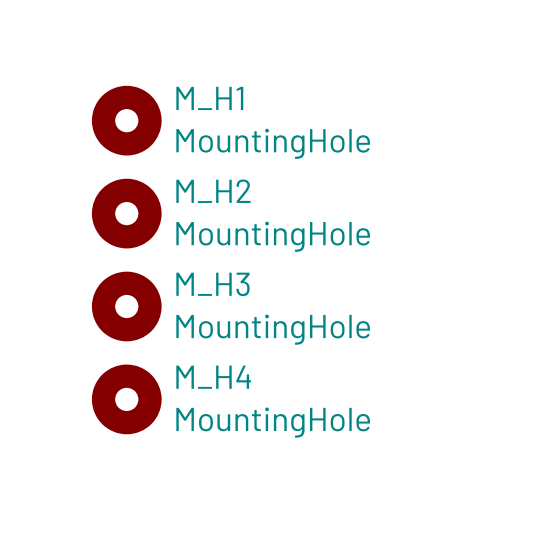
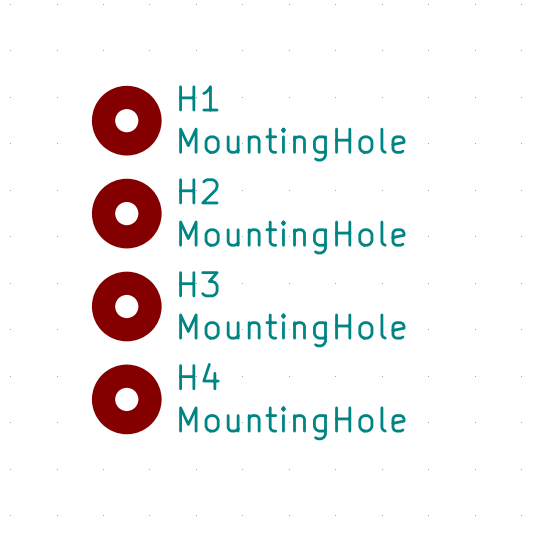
M_H1 name: M_H1 (209, 98) -> H1 (198, 98)
M_H2 name: M_H2 (213, 191) -> H2 (198, 191)
M_H3 name: M_H3 (213, 284) -> H3 (198, 284)
M_H4 name: M_H4 (213, 377) -> H4 (199, 376)

